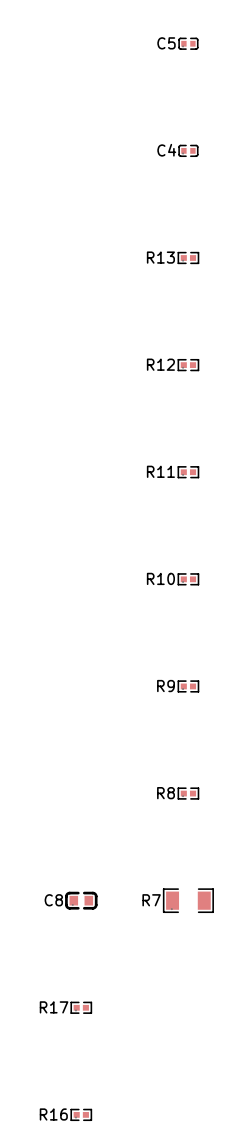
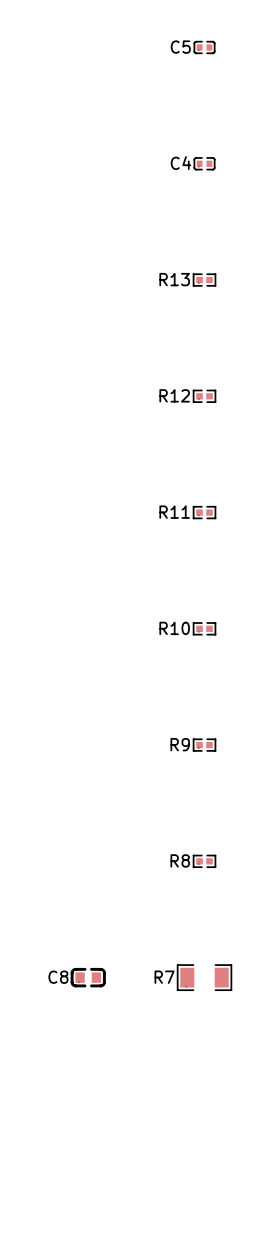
R17: (81, 1007) -> none
R16: (81, 1114) -> none

